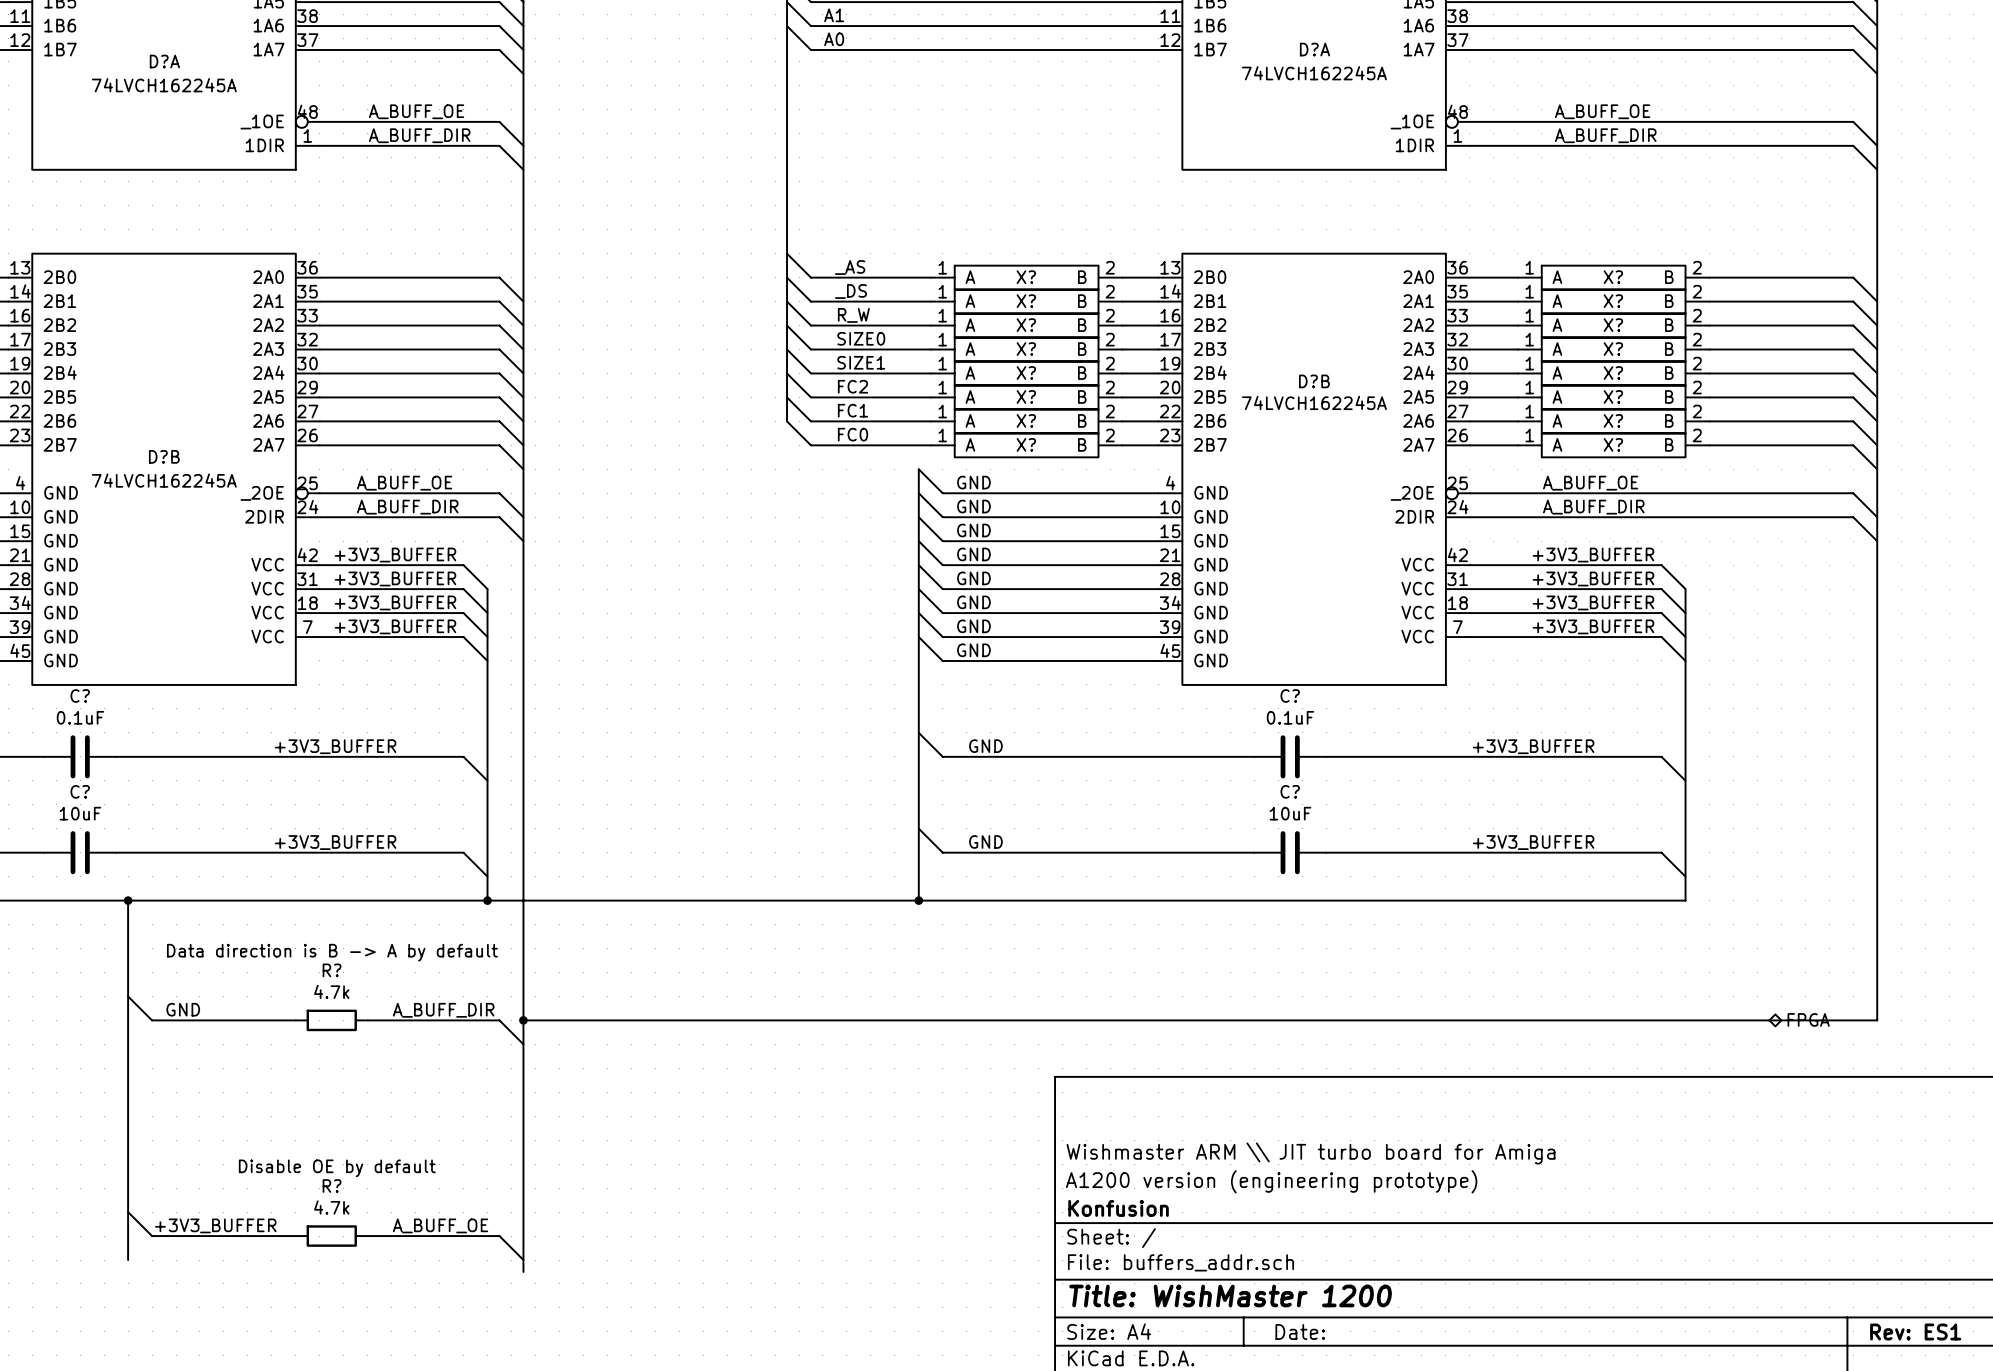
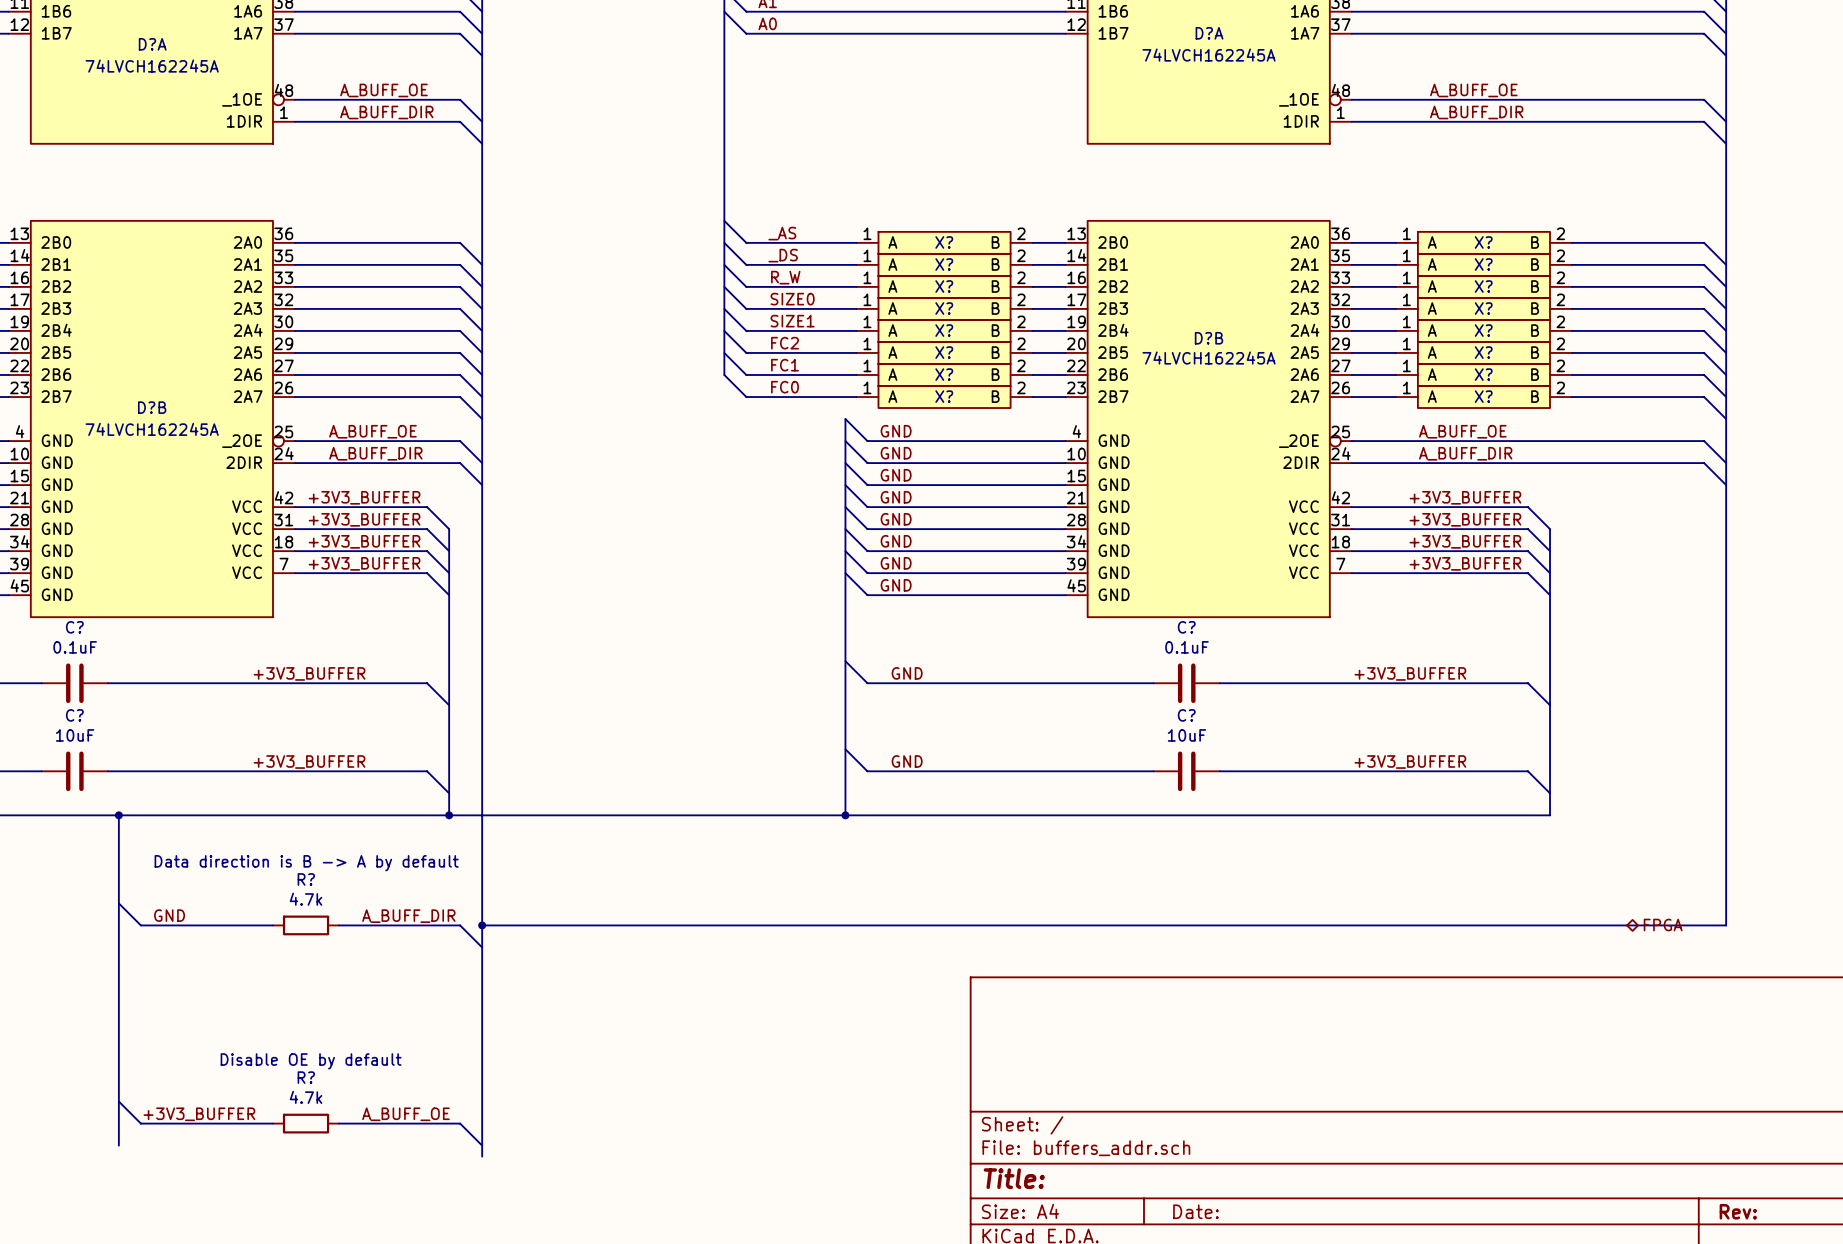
title block: Wishmaster ARM \\ JIT turbo board for Amiga (1311, 1153) -> none
title block: A1200 version (engineering prototype) (1271, 1181) -> none
title block: Konfusion (1118, 1208) -> none
title block: Title: WishMaster 1200 (1230, 1295) -> Title: (1014, 1178)
title block: Rev: ES1 (1915, 1331) -> Rev: (1738, 1211)

